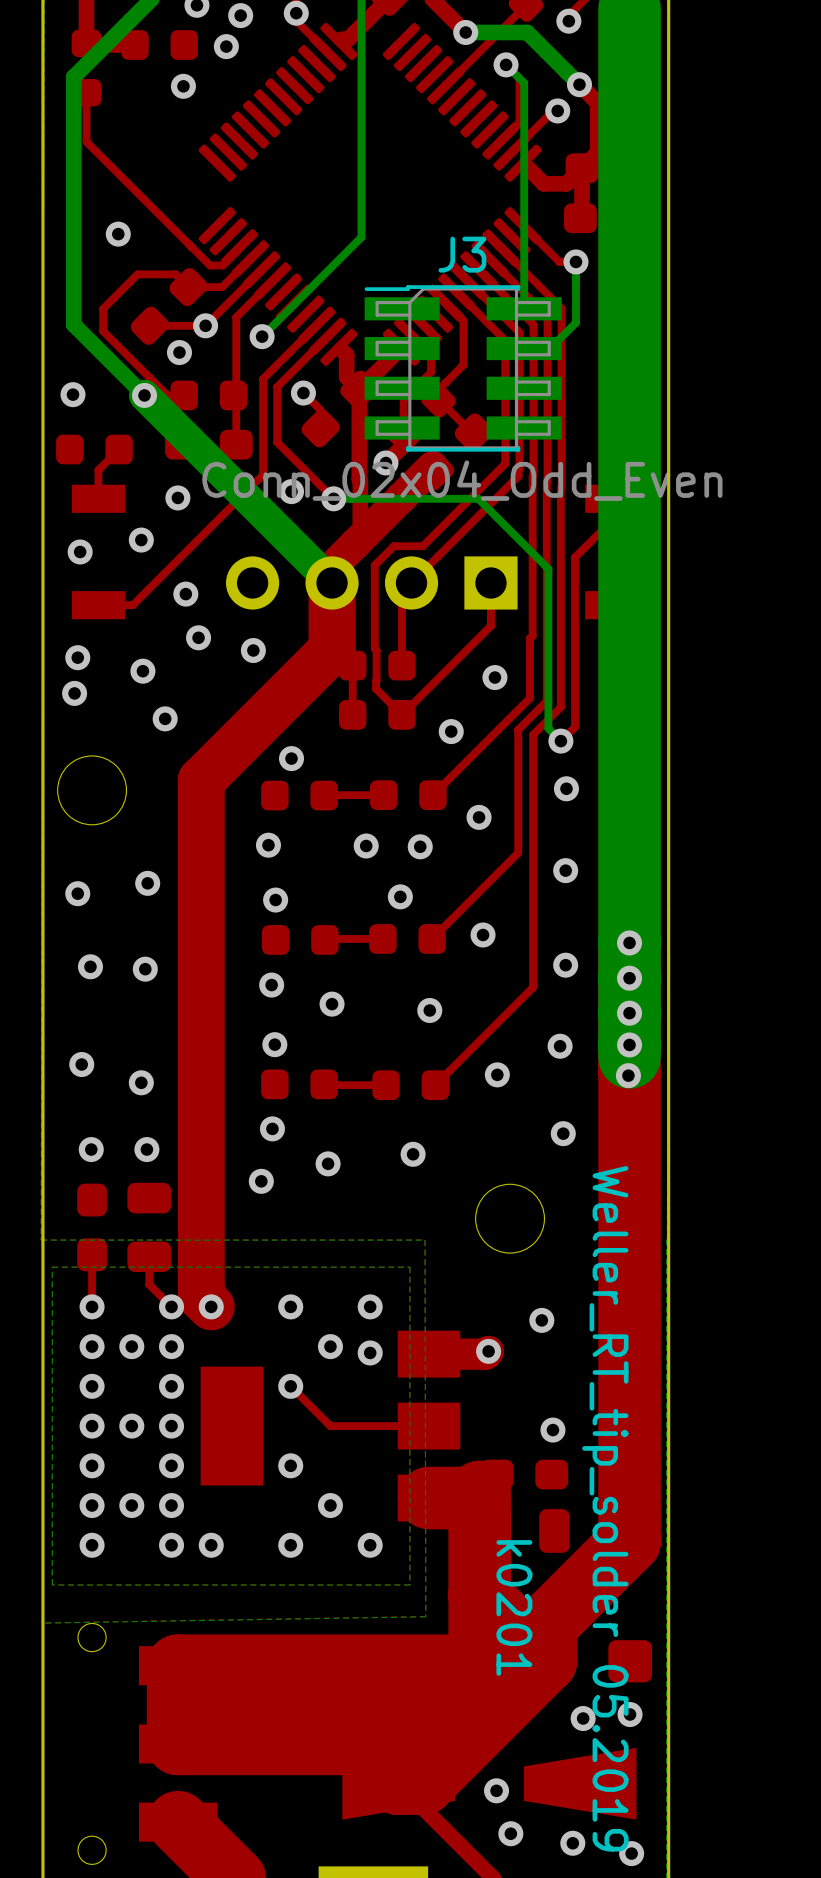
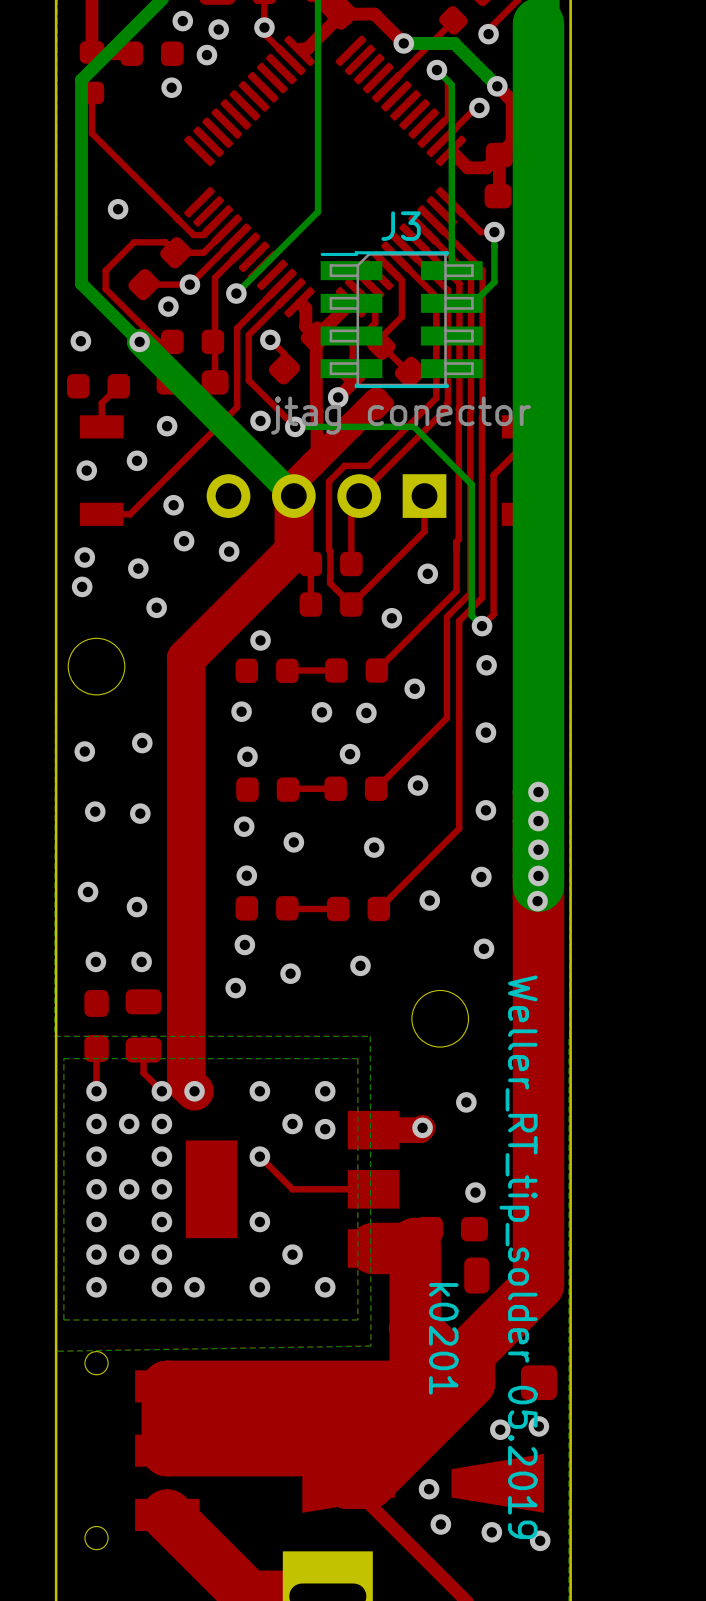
J3 value: Conn_02x04_Odd_Even (462, 480) -> jtag conector (401, 415)

